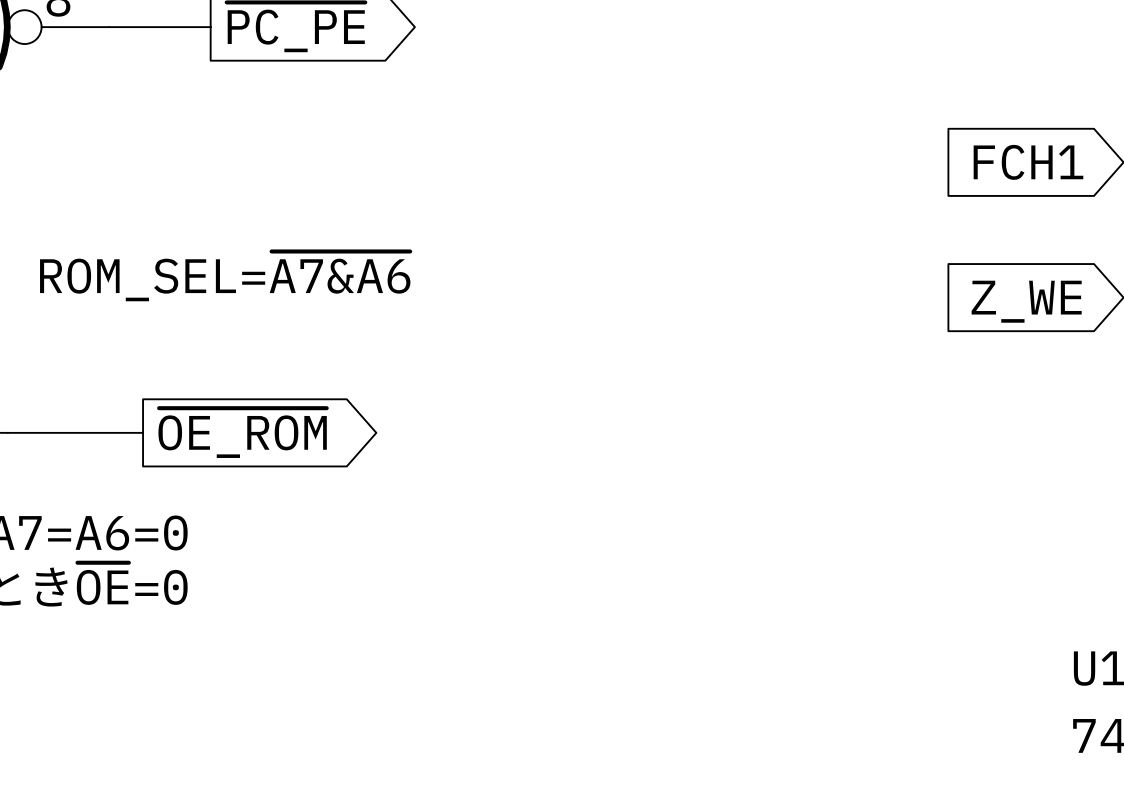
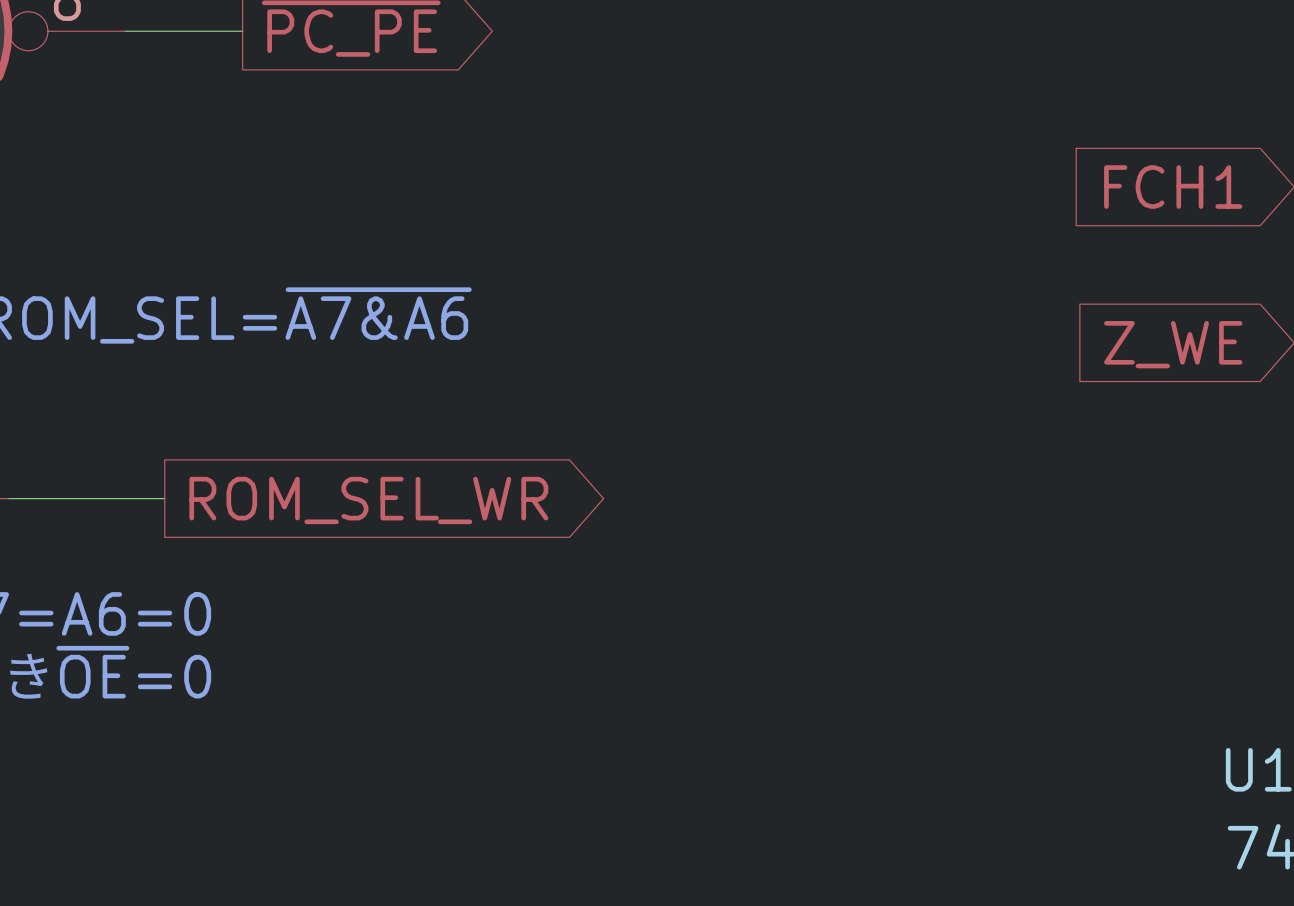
global label: ~{OE_ROM} (242, 433) -> ROM_SEL_WR (368, 500)

